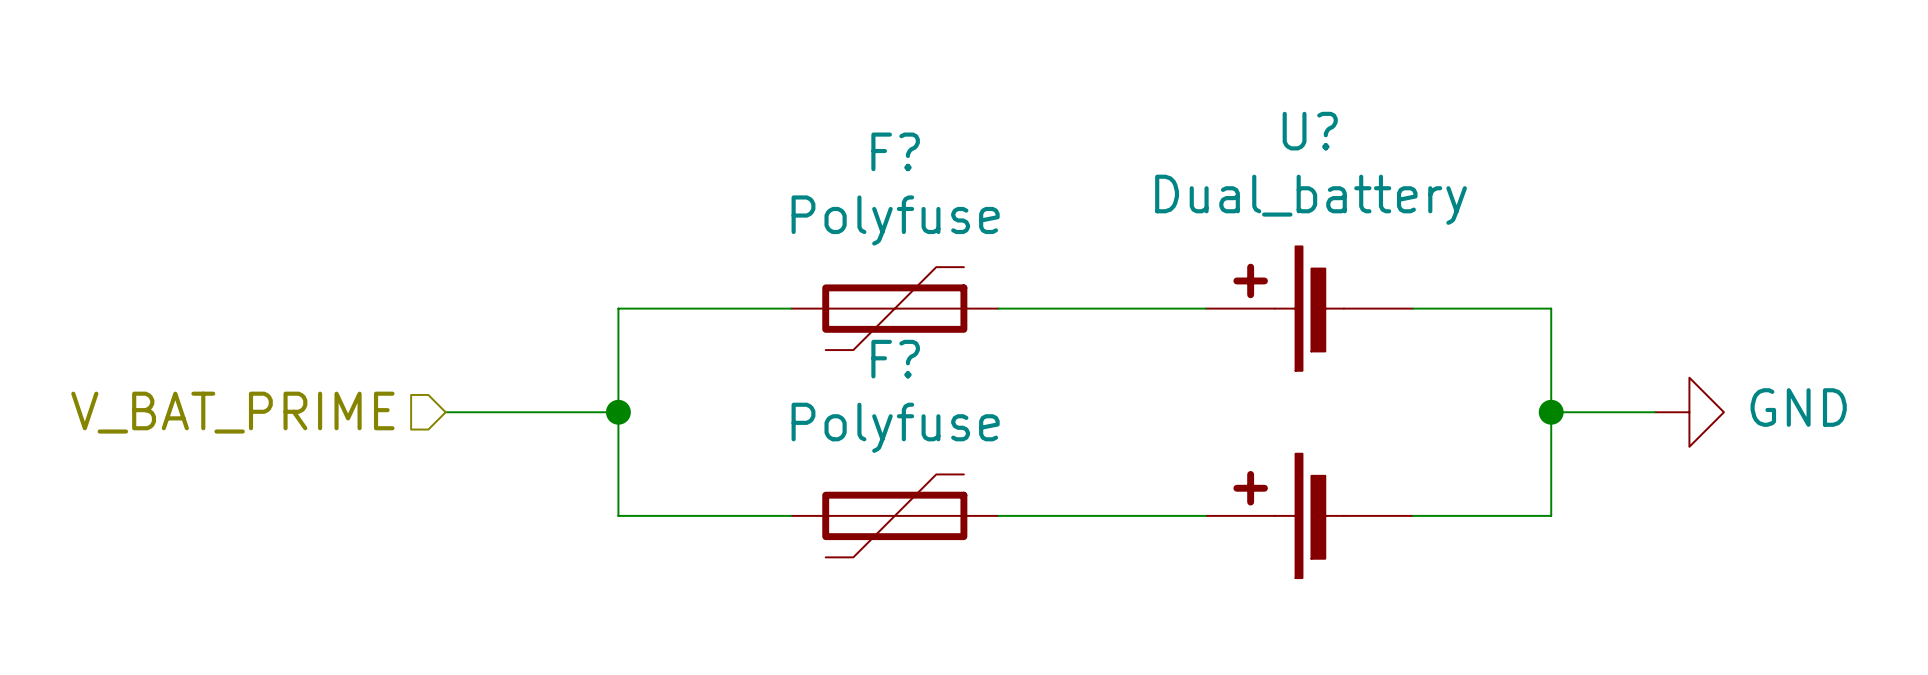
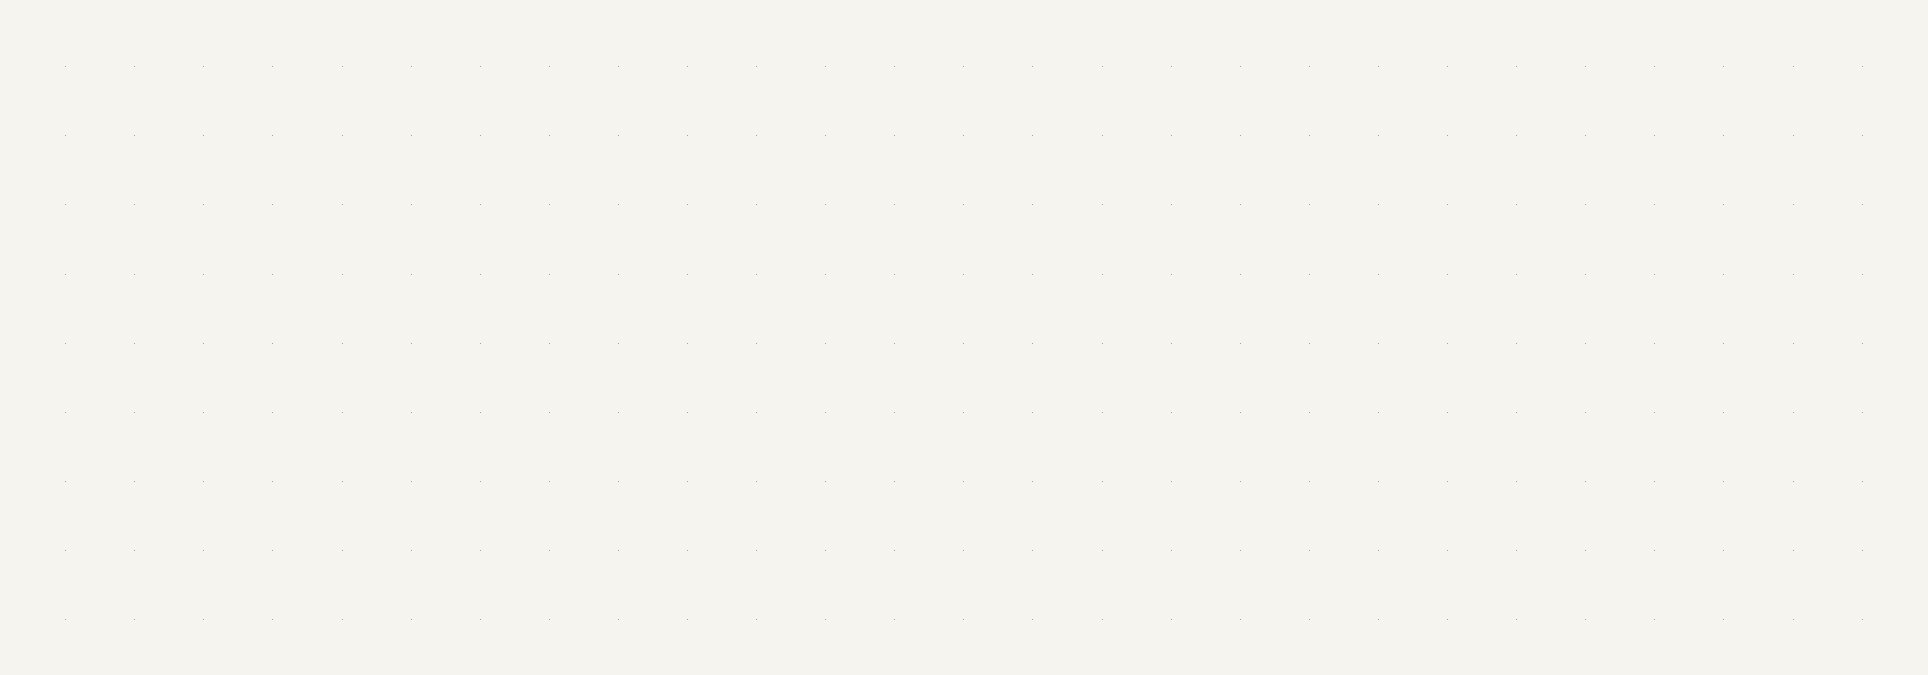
wire: (791, 308) (618, 308) (618, 515) (791, 515) -> none
F?: Polyfuse (894, 308) -> none
wire: (998, 308) (1205, 308) -> none
wire: (1413, 308) (1551, 308) (1551, 515) (1413, 515) -> none
hierarchical label: V_BAT_PRIME (232, 412) -> none
wire: (445, 412) (618, 412) -> none
junction: (618, 412) -> none
U?: Dual_battery (1309, 412) -> none
wire: (1551, 412) (1654, 412) -> none
junction: (1551, 412) -> none
power symbol: GND (1689, 412) -> none
F?: Polyfuse (894, 515) -> none
wire: (998, 515) (1205, 515) -> none

